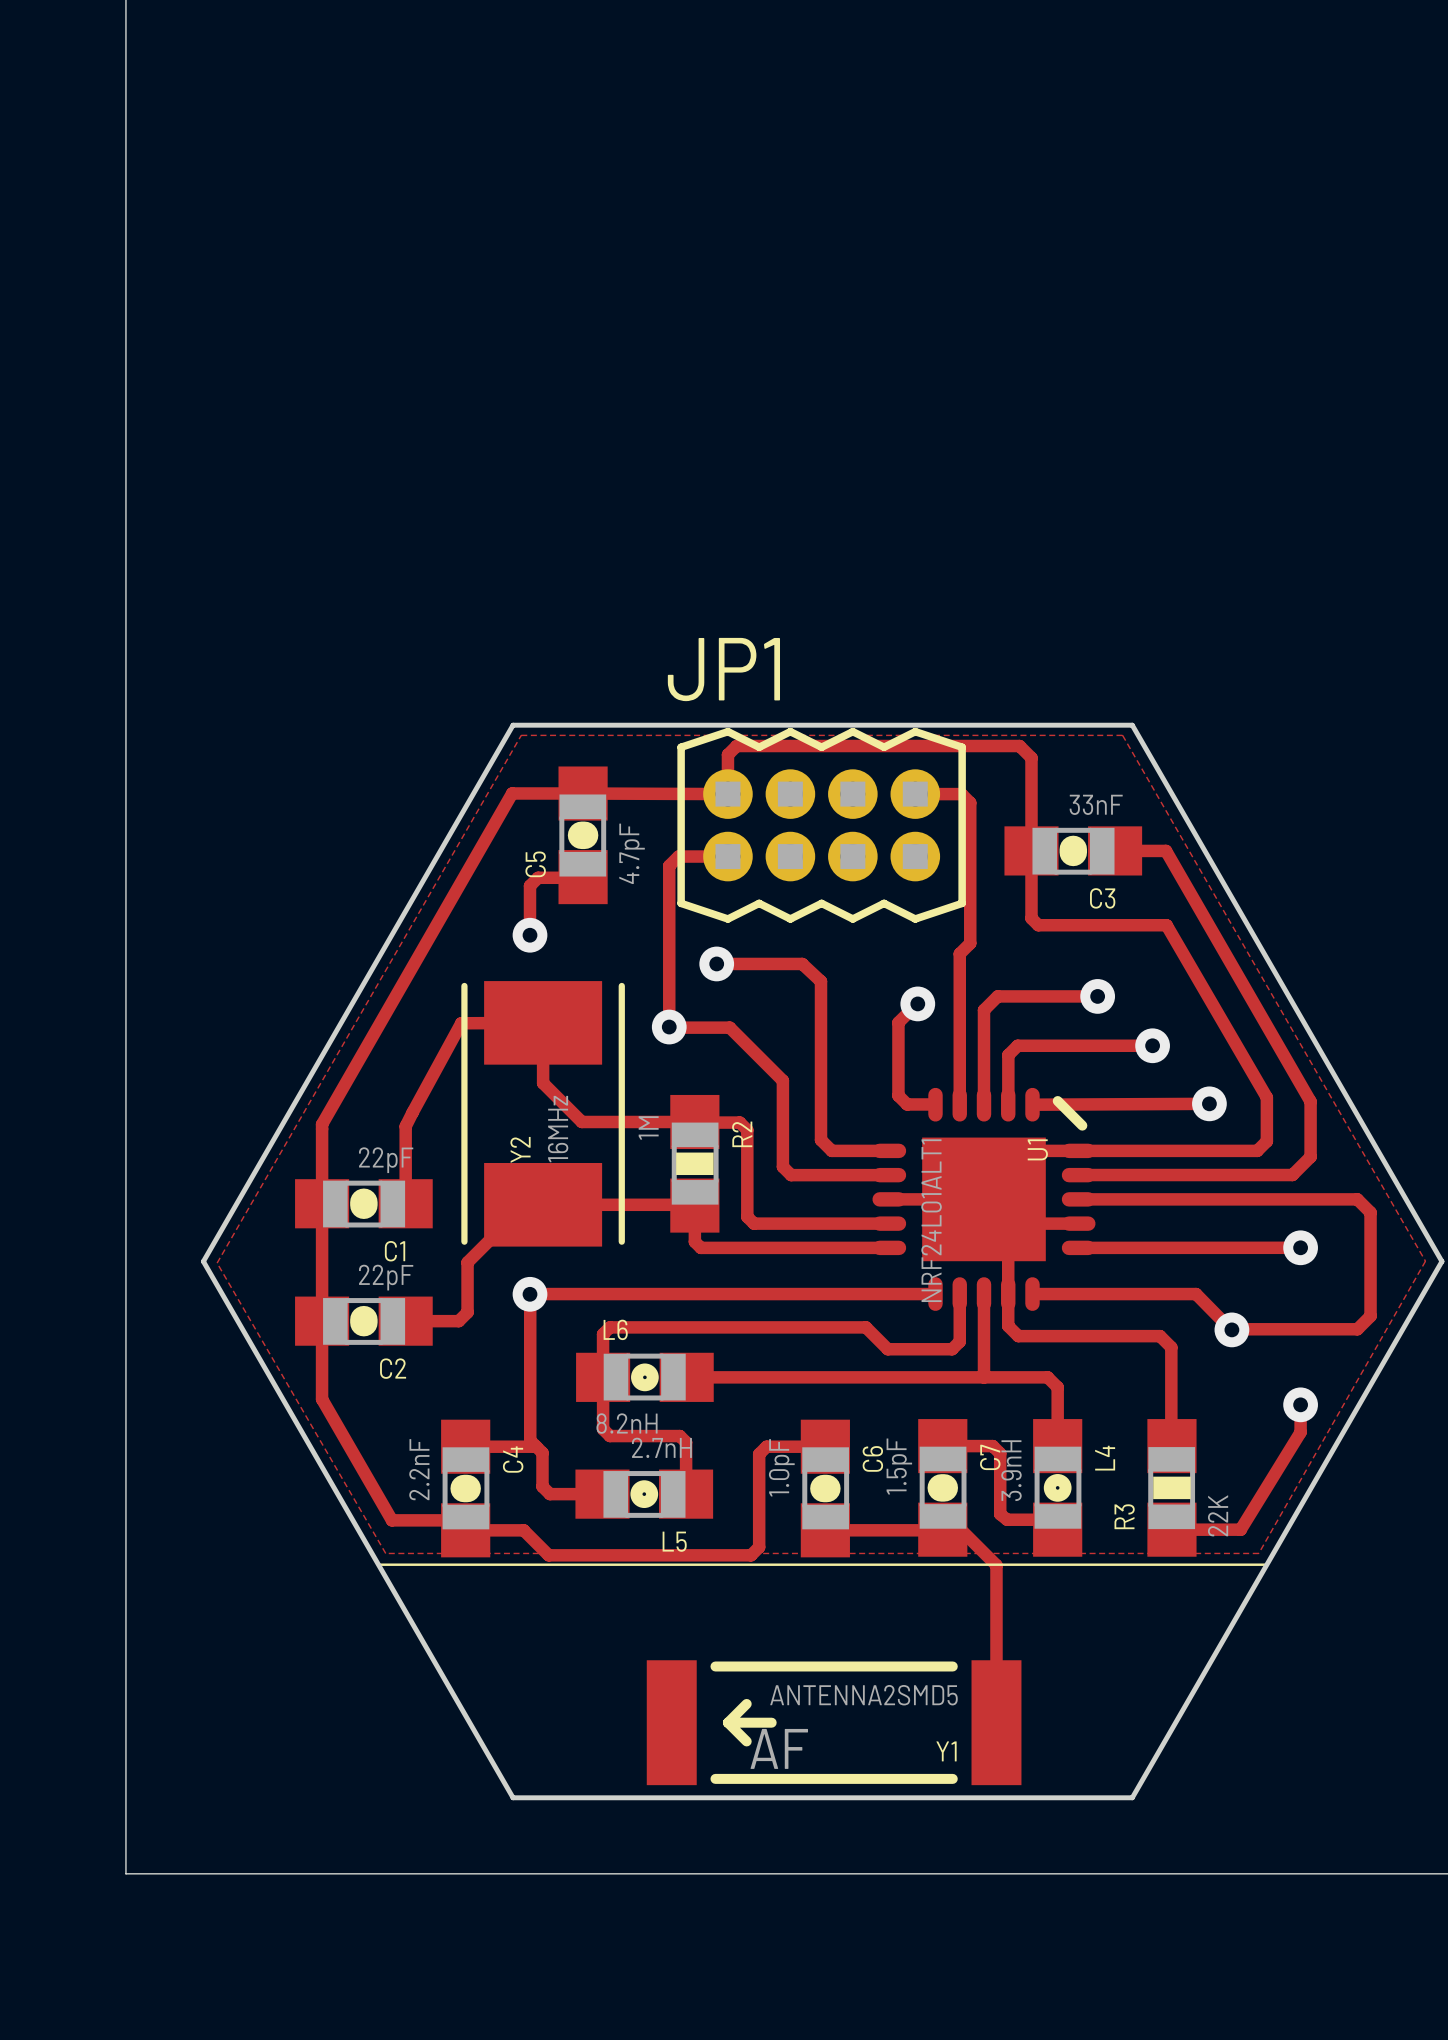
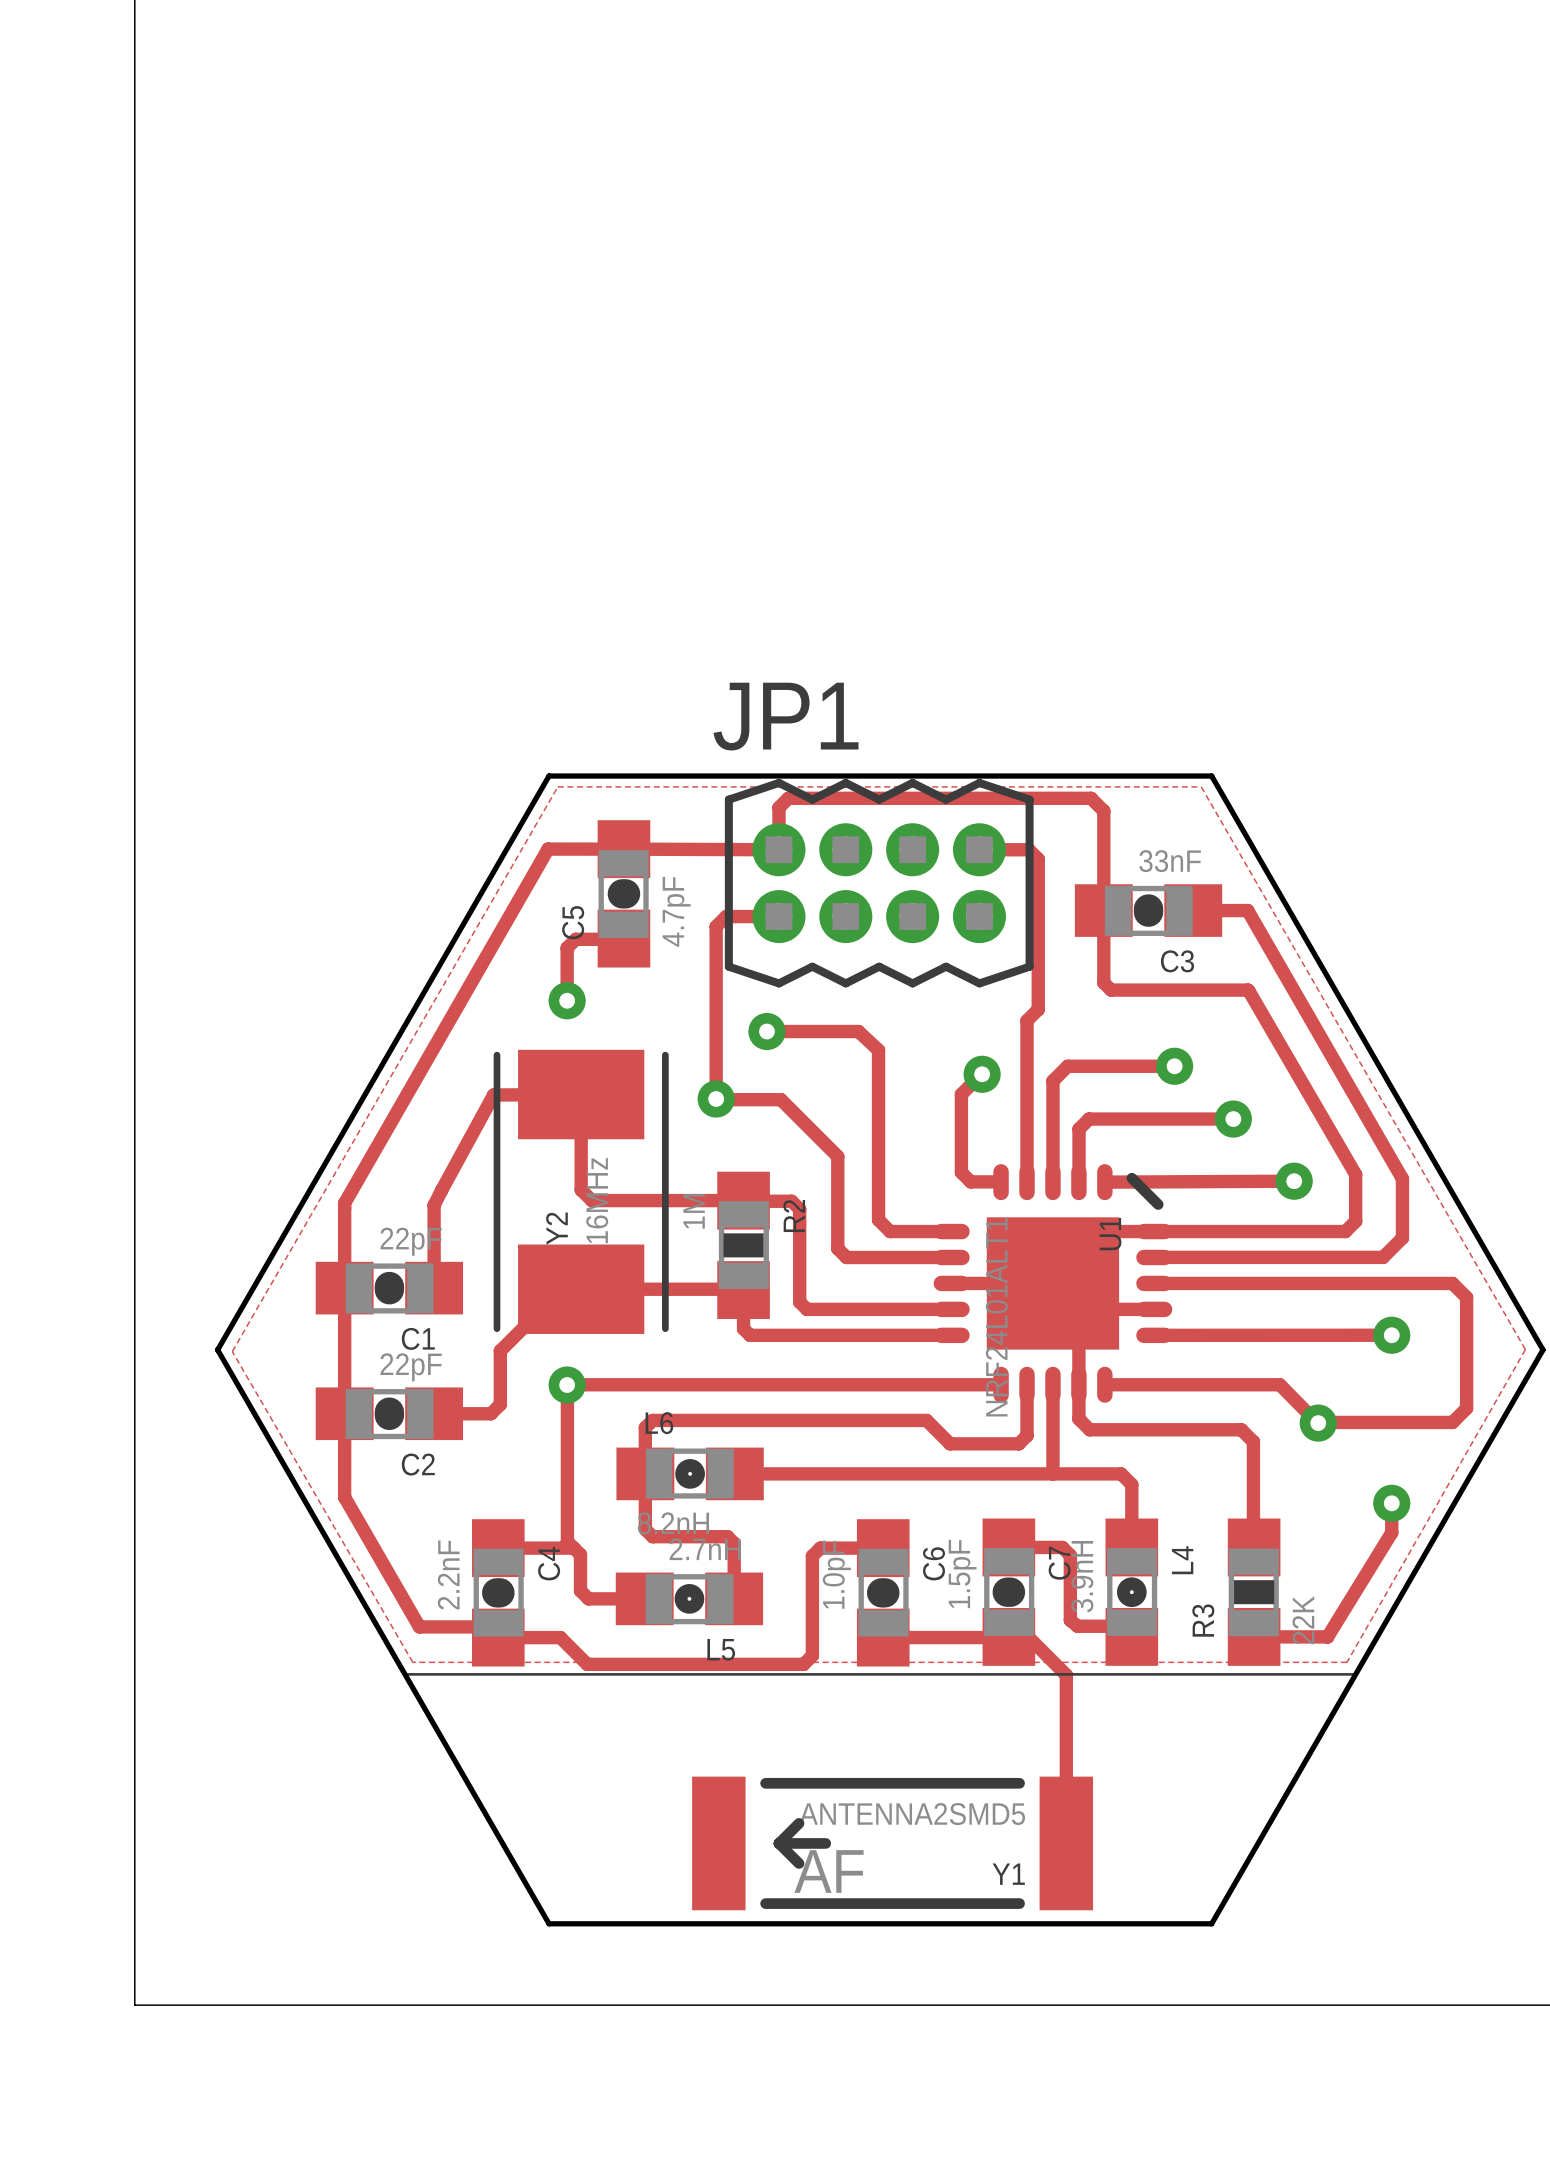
track: (543, 1083) (581, 1121) -> (581, 1159) (581, 1189) (591, 1200) (622, 1200)

